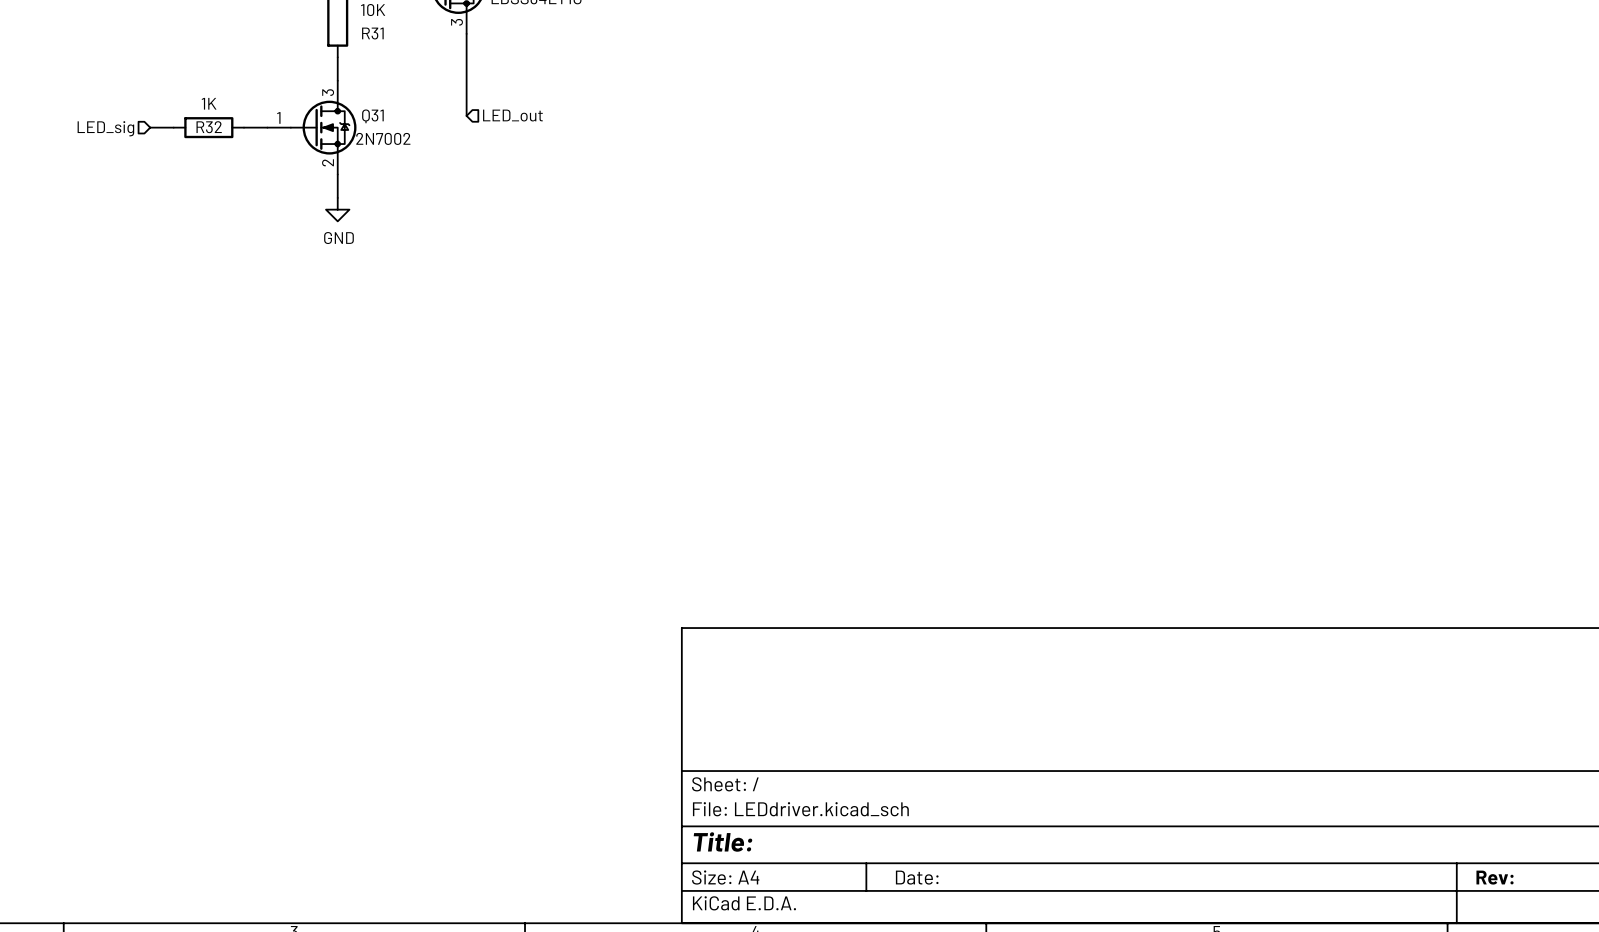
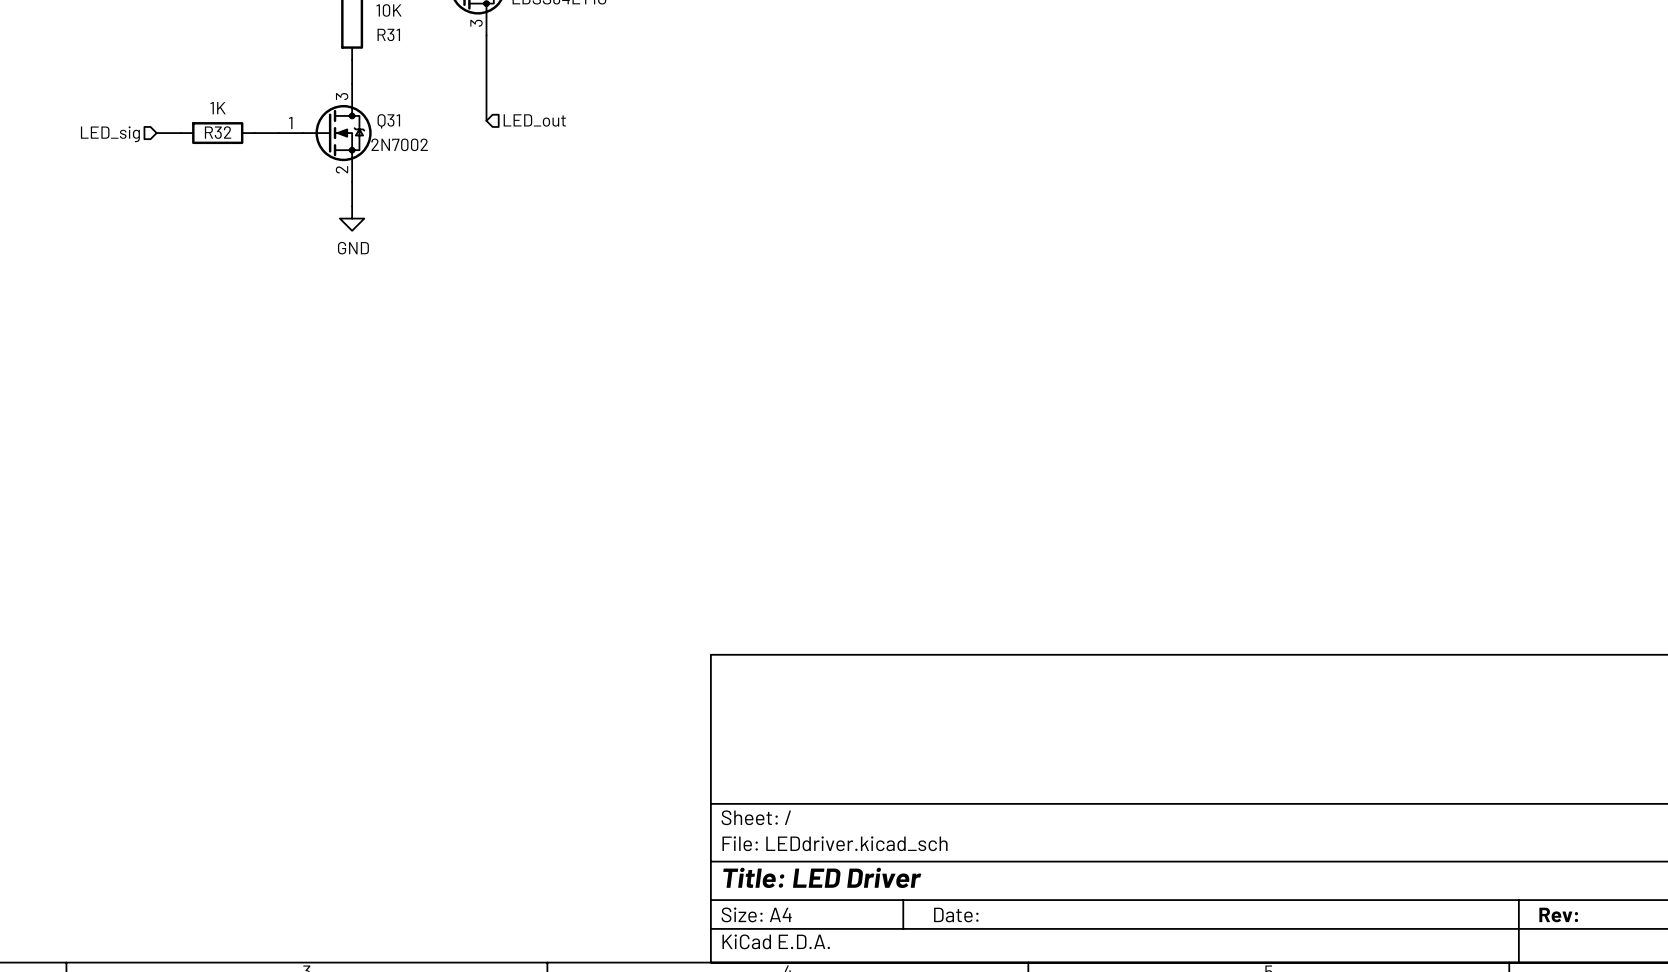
title block: Title: (723, 842) -> Title: LED Driver (822, 877)

